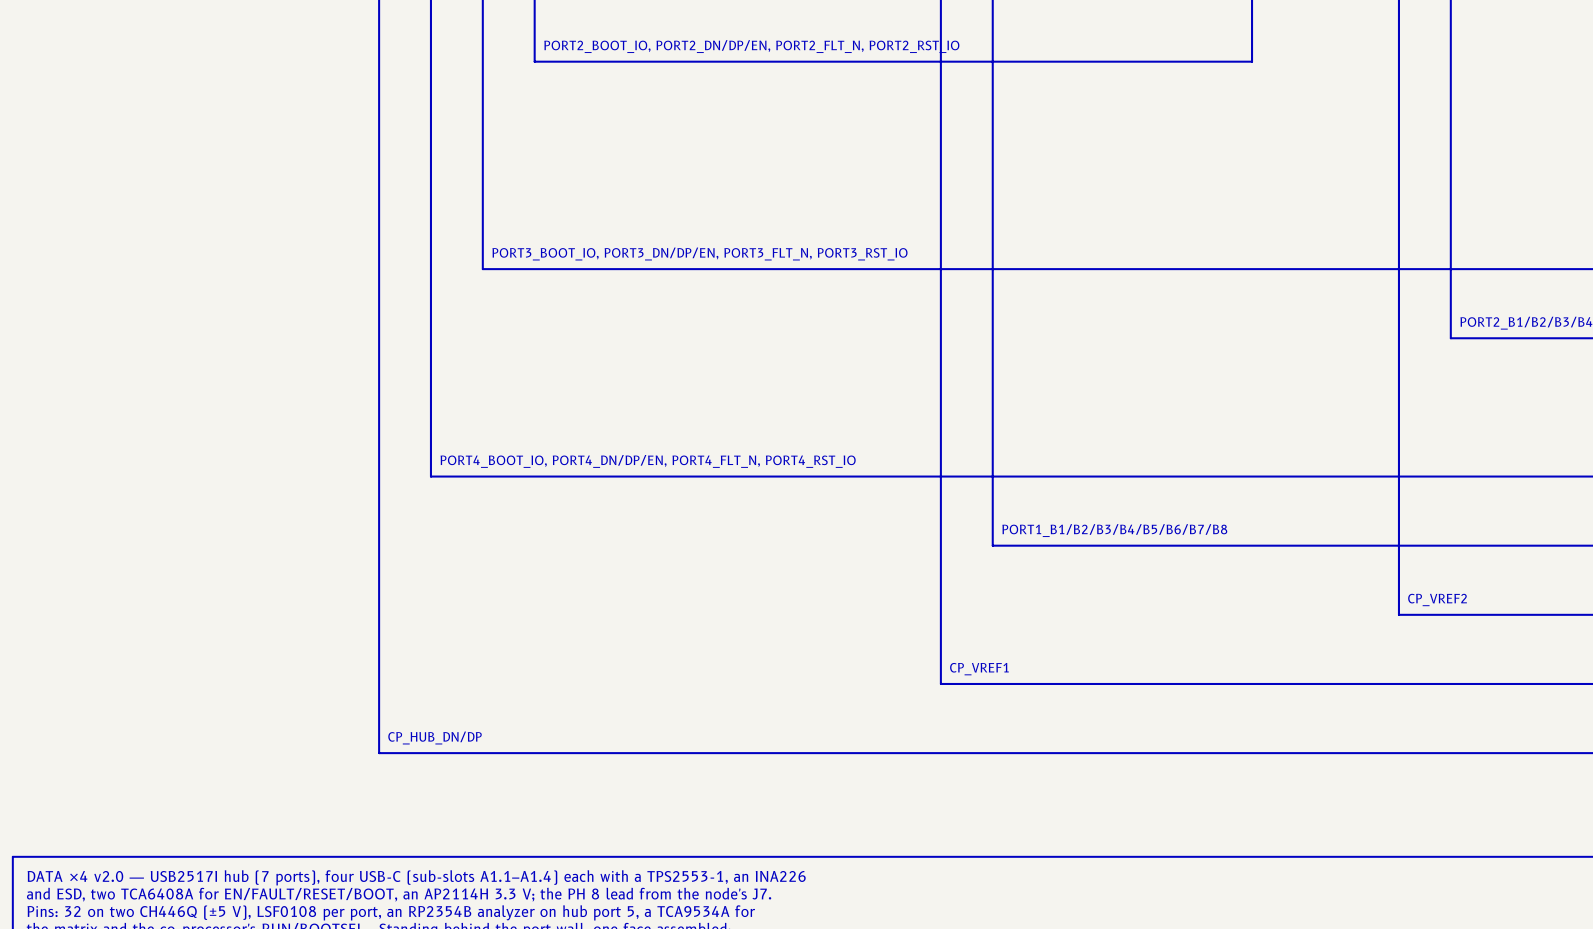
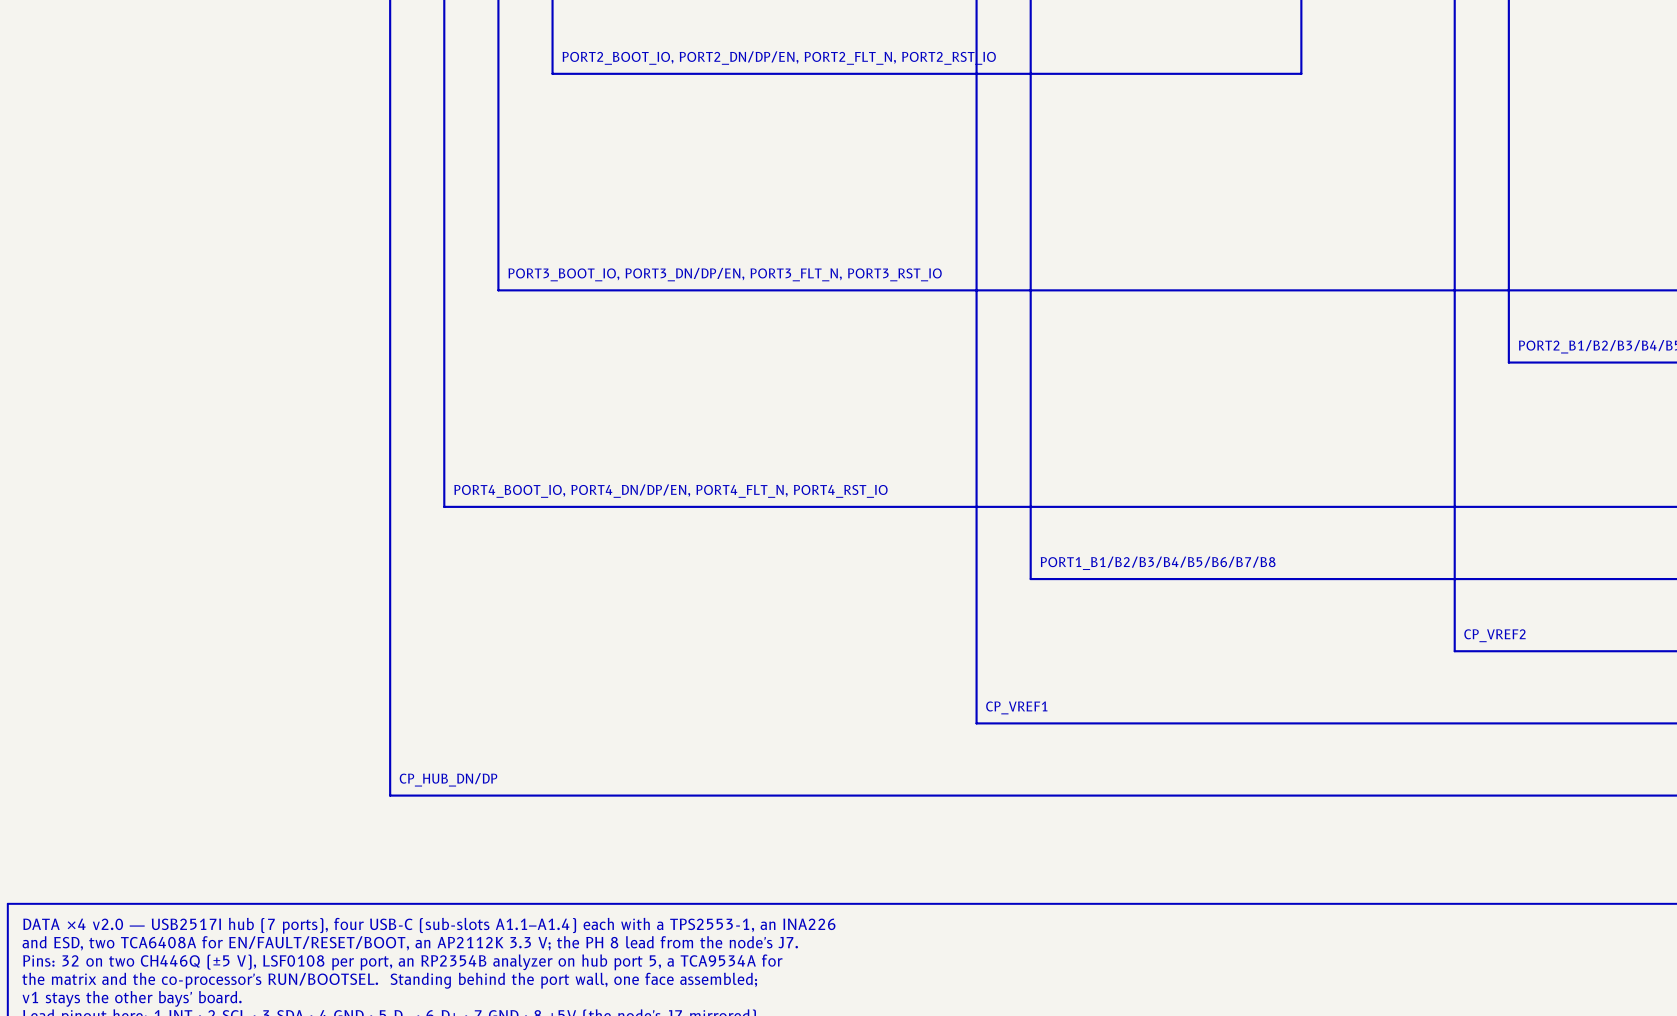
text: and ESD, two TCA6408A for EN/FAULT/RESET/BOOT, an AP2114H 3.3 V; the PH 8 lead from the node's J7. (399, 894) -> and ESD, two TCA6408A for EN/FAULT/RESET/BOOT, an AP2112K 3.3 V; the PH 8 lead from the node's J7. (410, 943)

